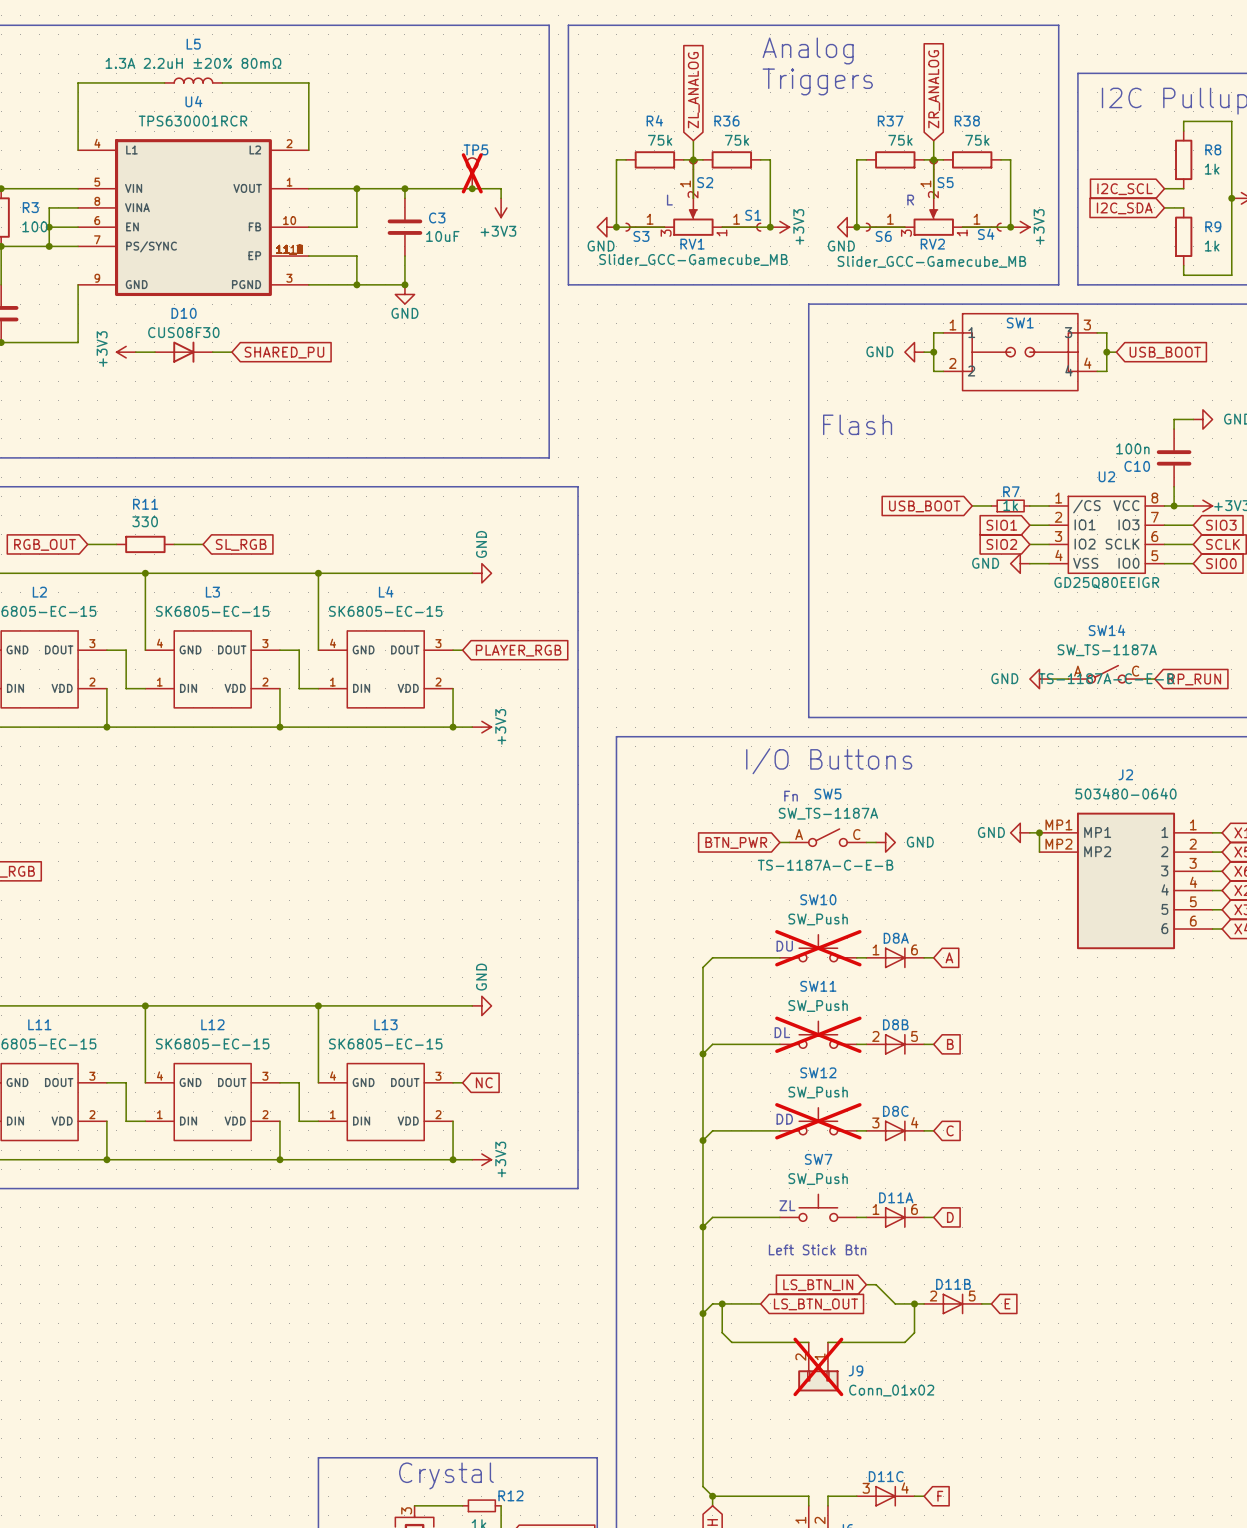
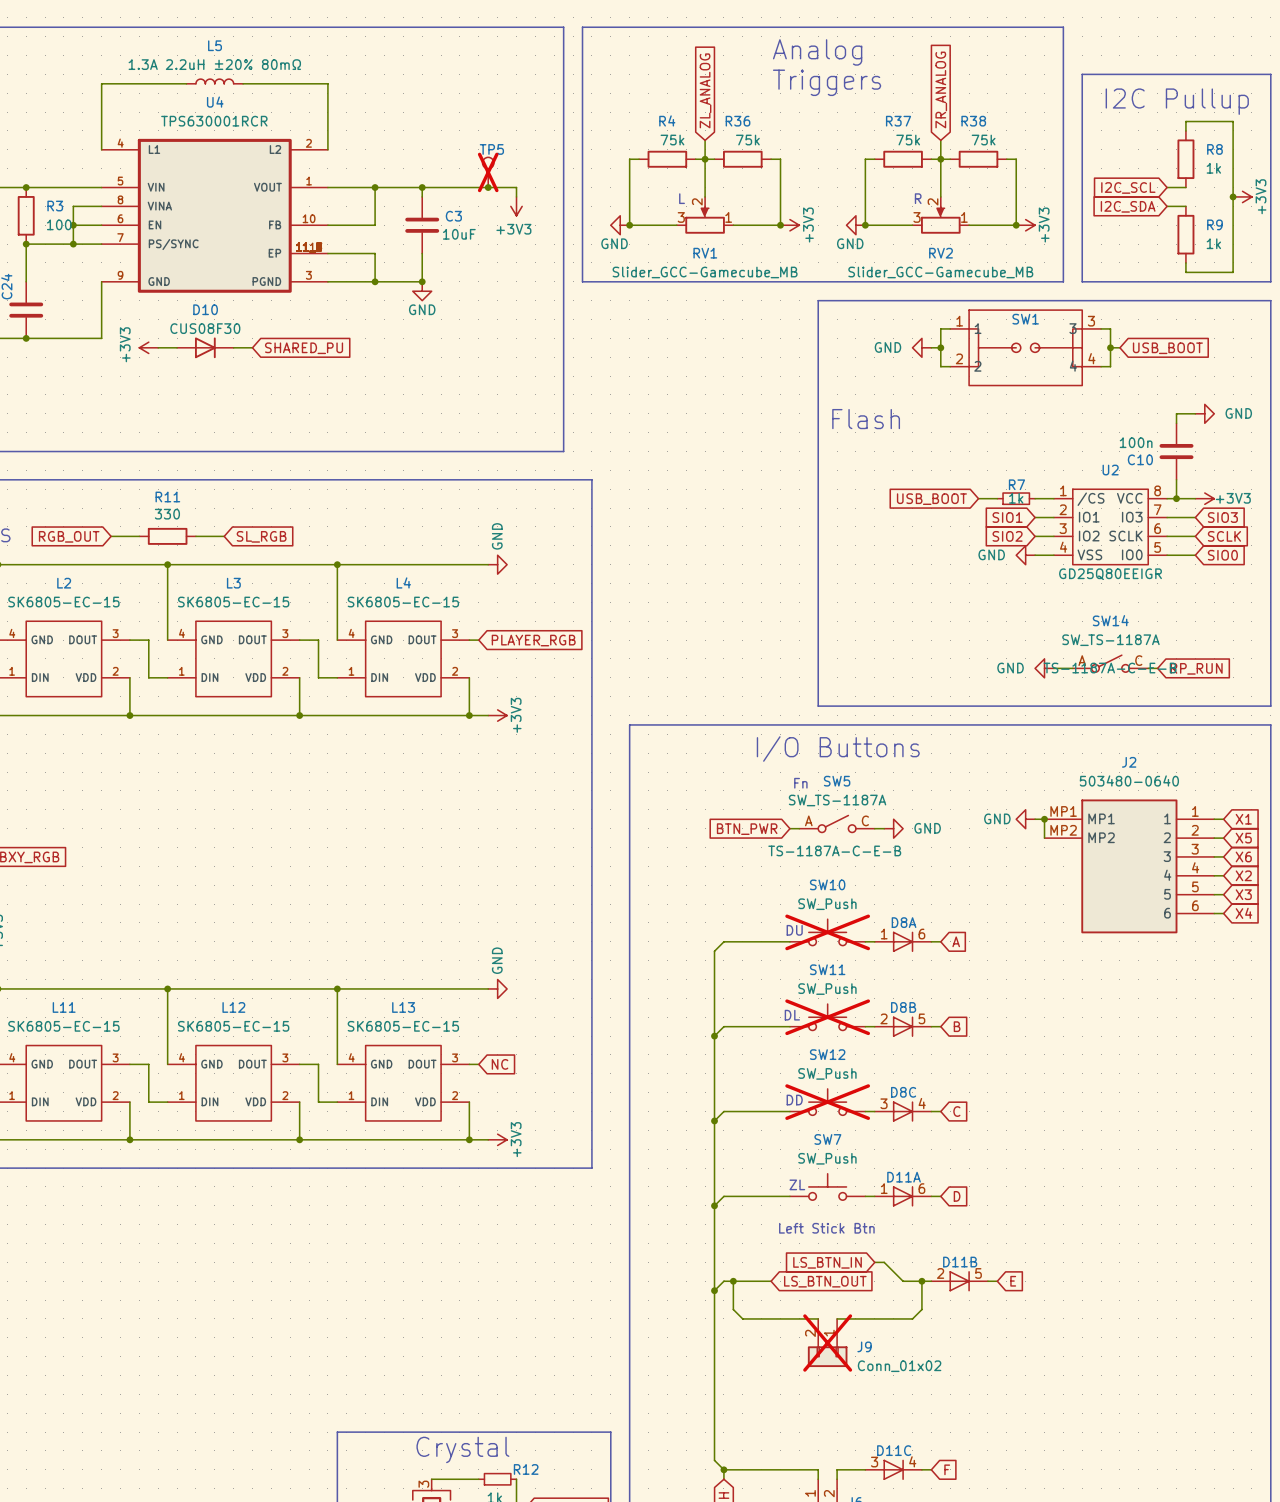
S2: (693, 178) -> none
S5: (933, 178) -> none
RV1 symbol: [664, 198, 723, 236] -> [676, 196, 734, 234]
RV2 symbol: [904, 198, 963, 236] -> [912, 196, 970, 234]
S3: (645, 227) -> none
S1: (741, 227) -> none
S6: (885, 227) -> none
S4: (982, 227) -> none
RV1 value position: Slider_GCC-Gamecube_MB (693, 259) -> Slider_GCC-Gamecube_MB (705, 272)
RV2 value position: Slider_GCC-Gamecube_MB (931, 261) -> Slider_GCC-Gamecube_MB (940, 272)

